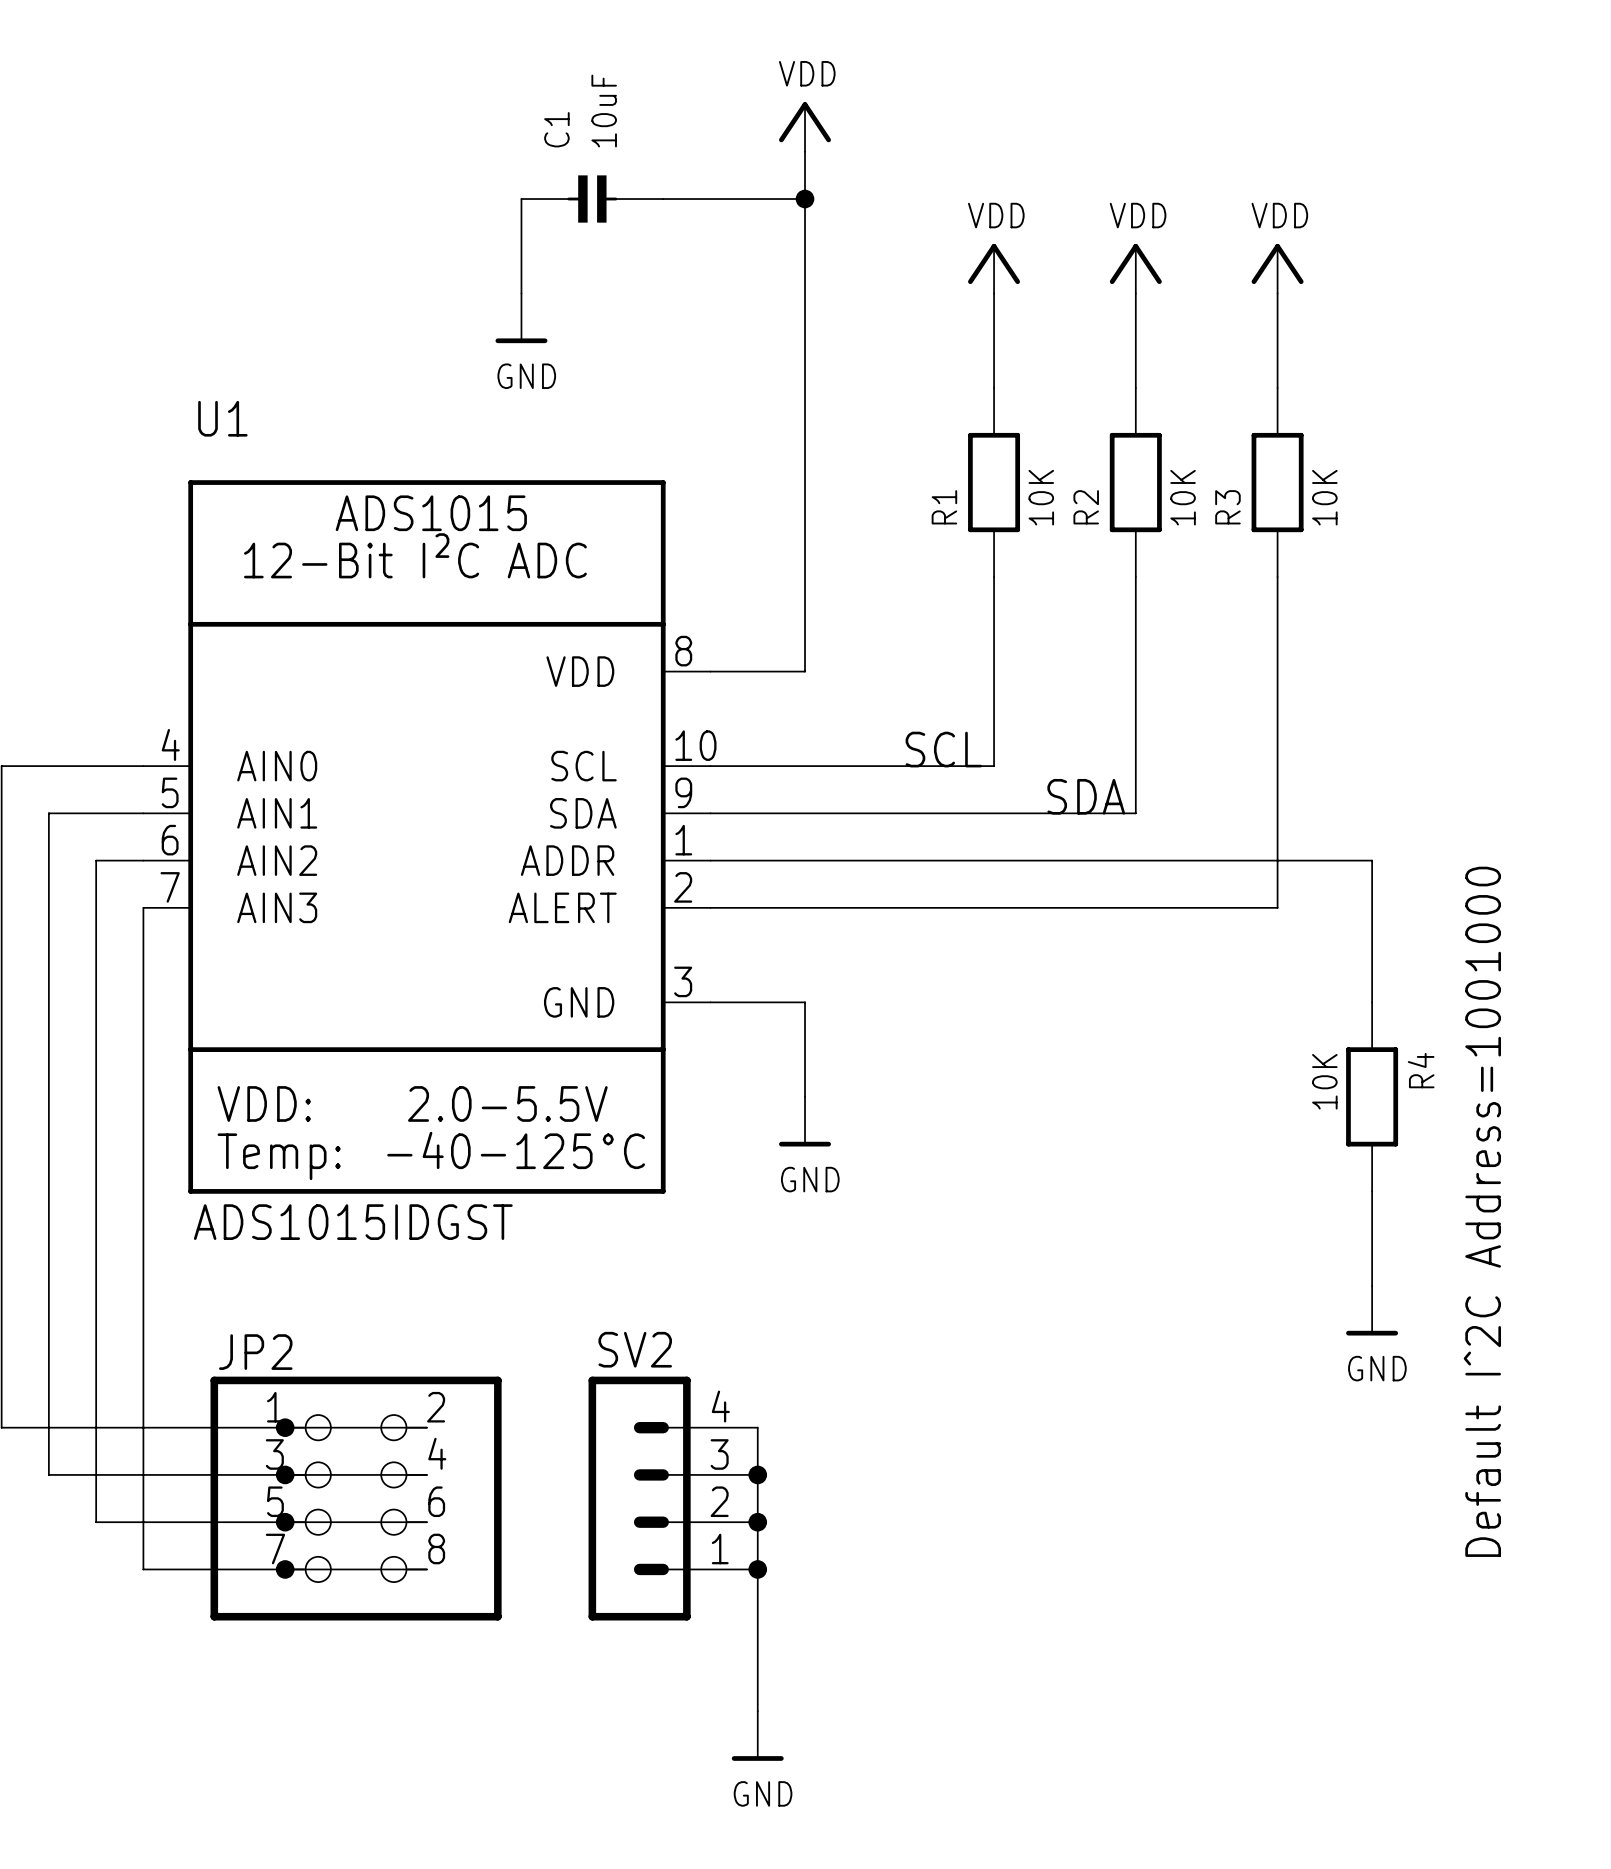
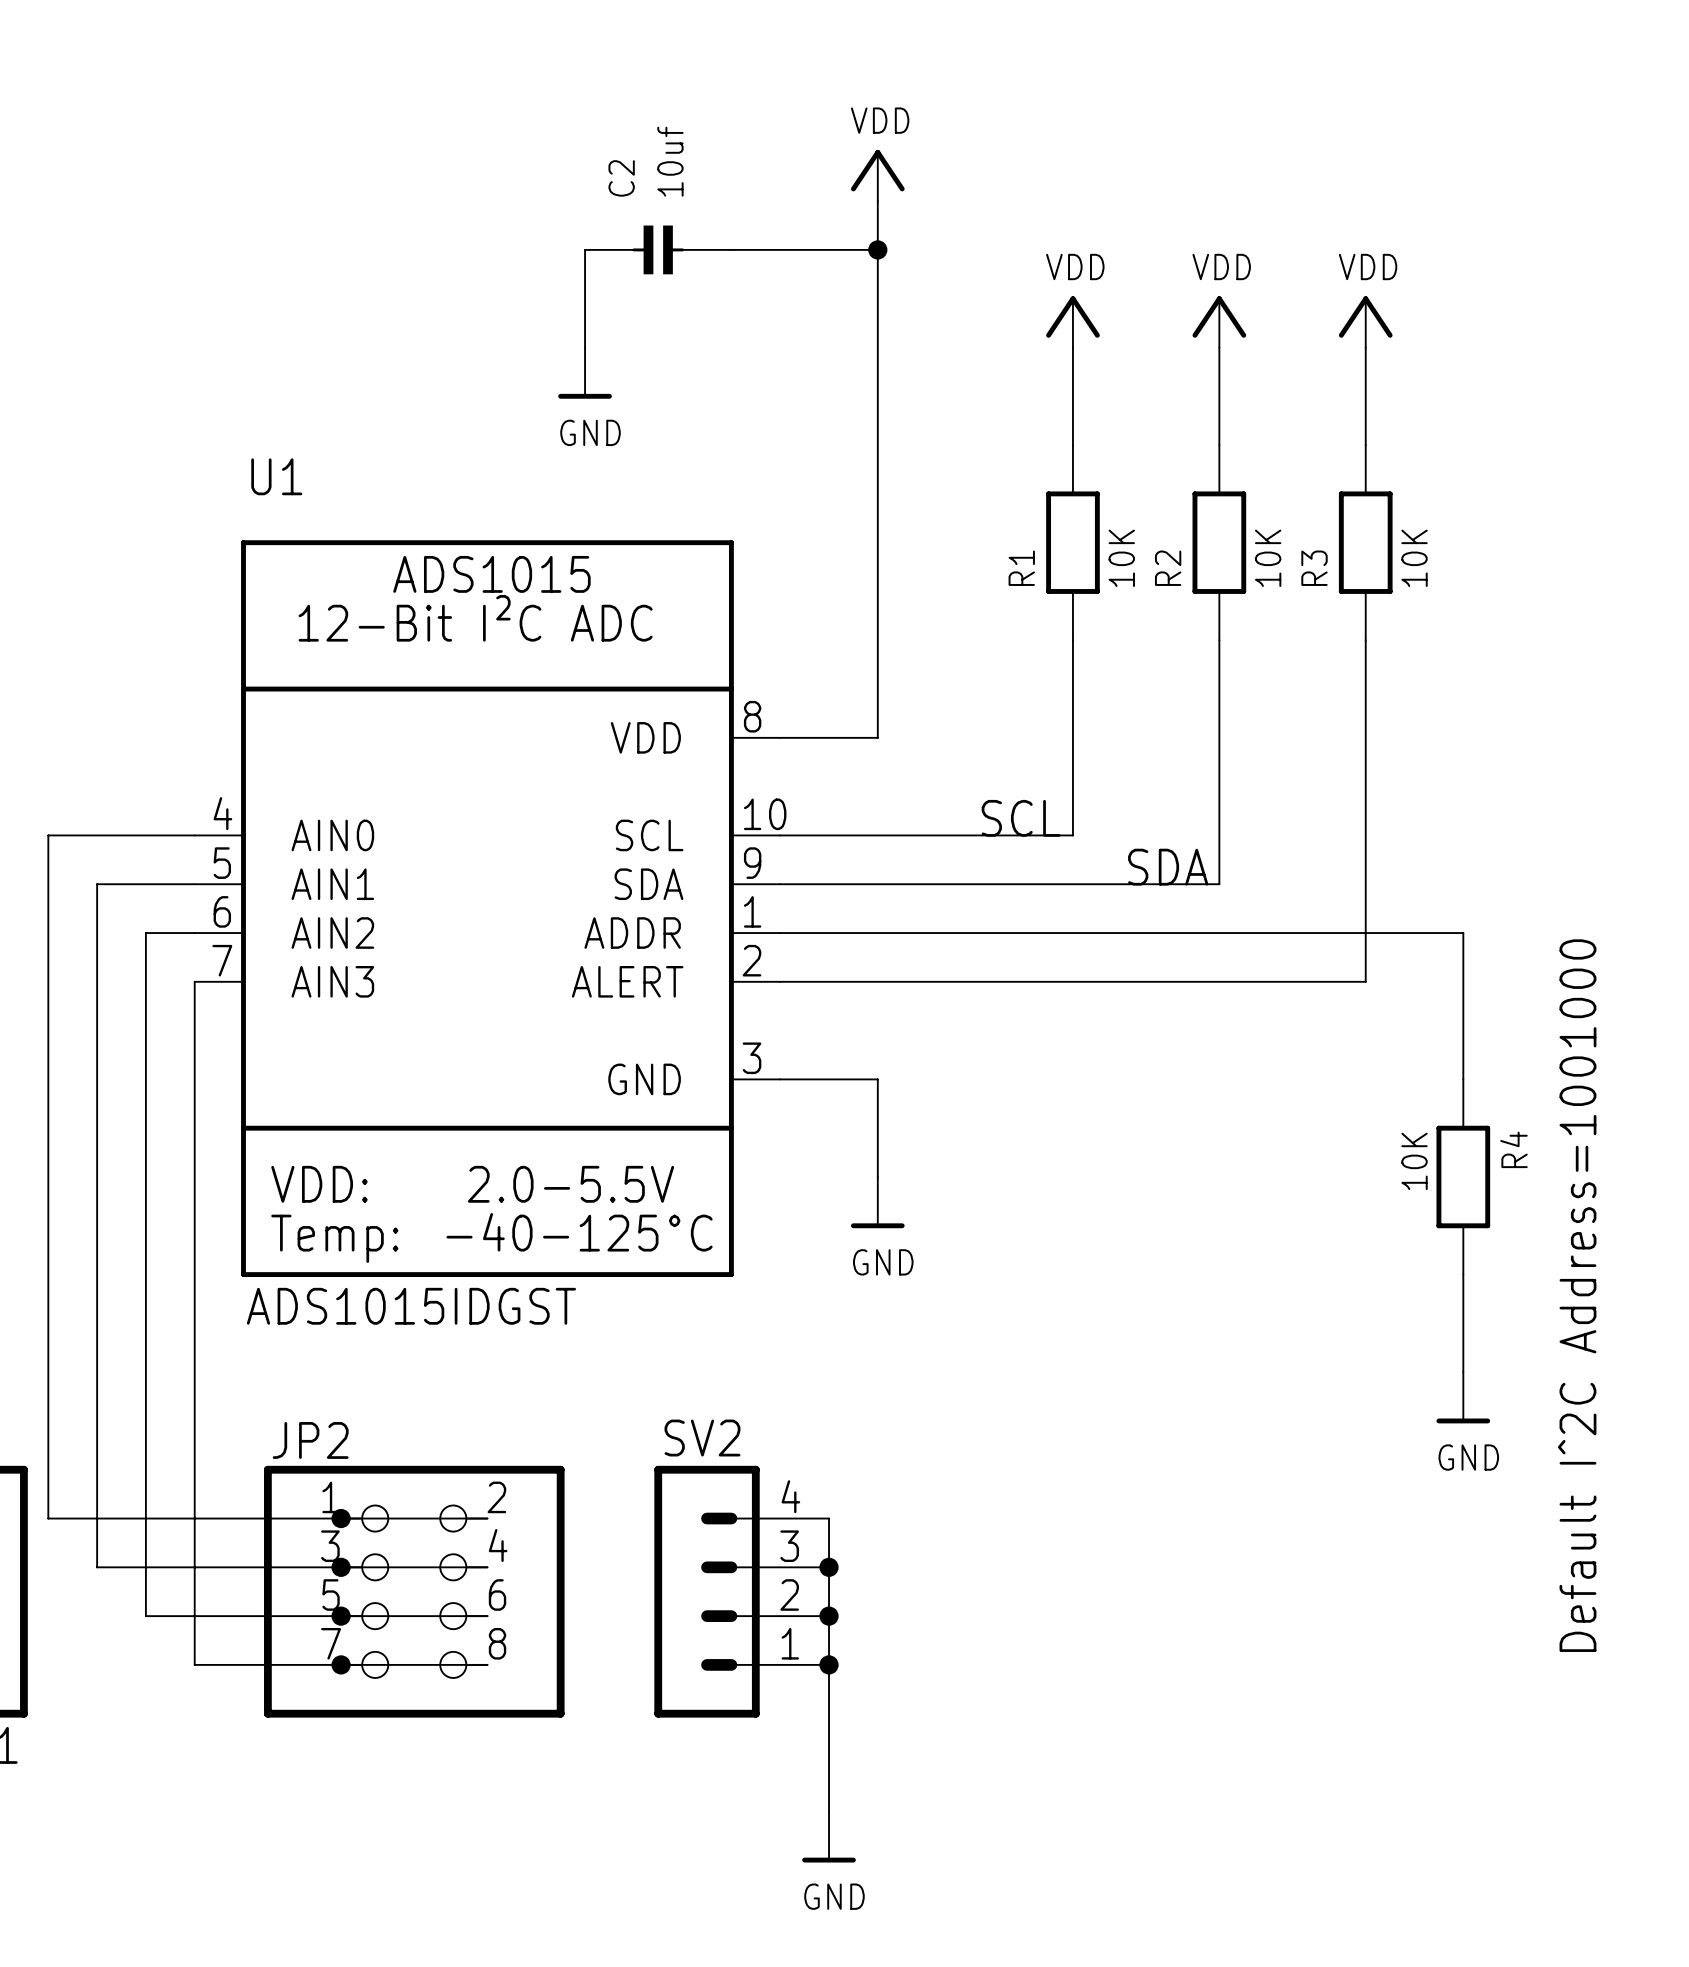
C1 value: 10uF (604, 111) -> 10uf (670, 161)
C1 name: C1 (556, 129) -> C2 (621, 178)

